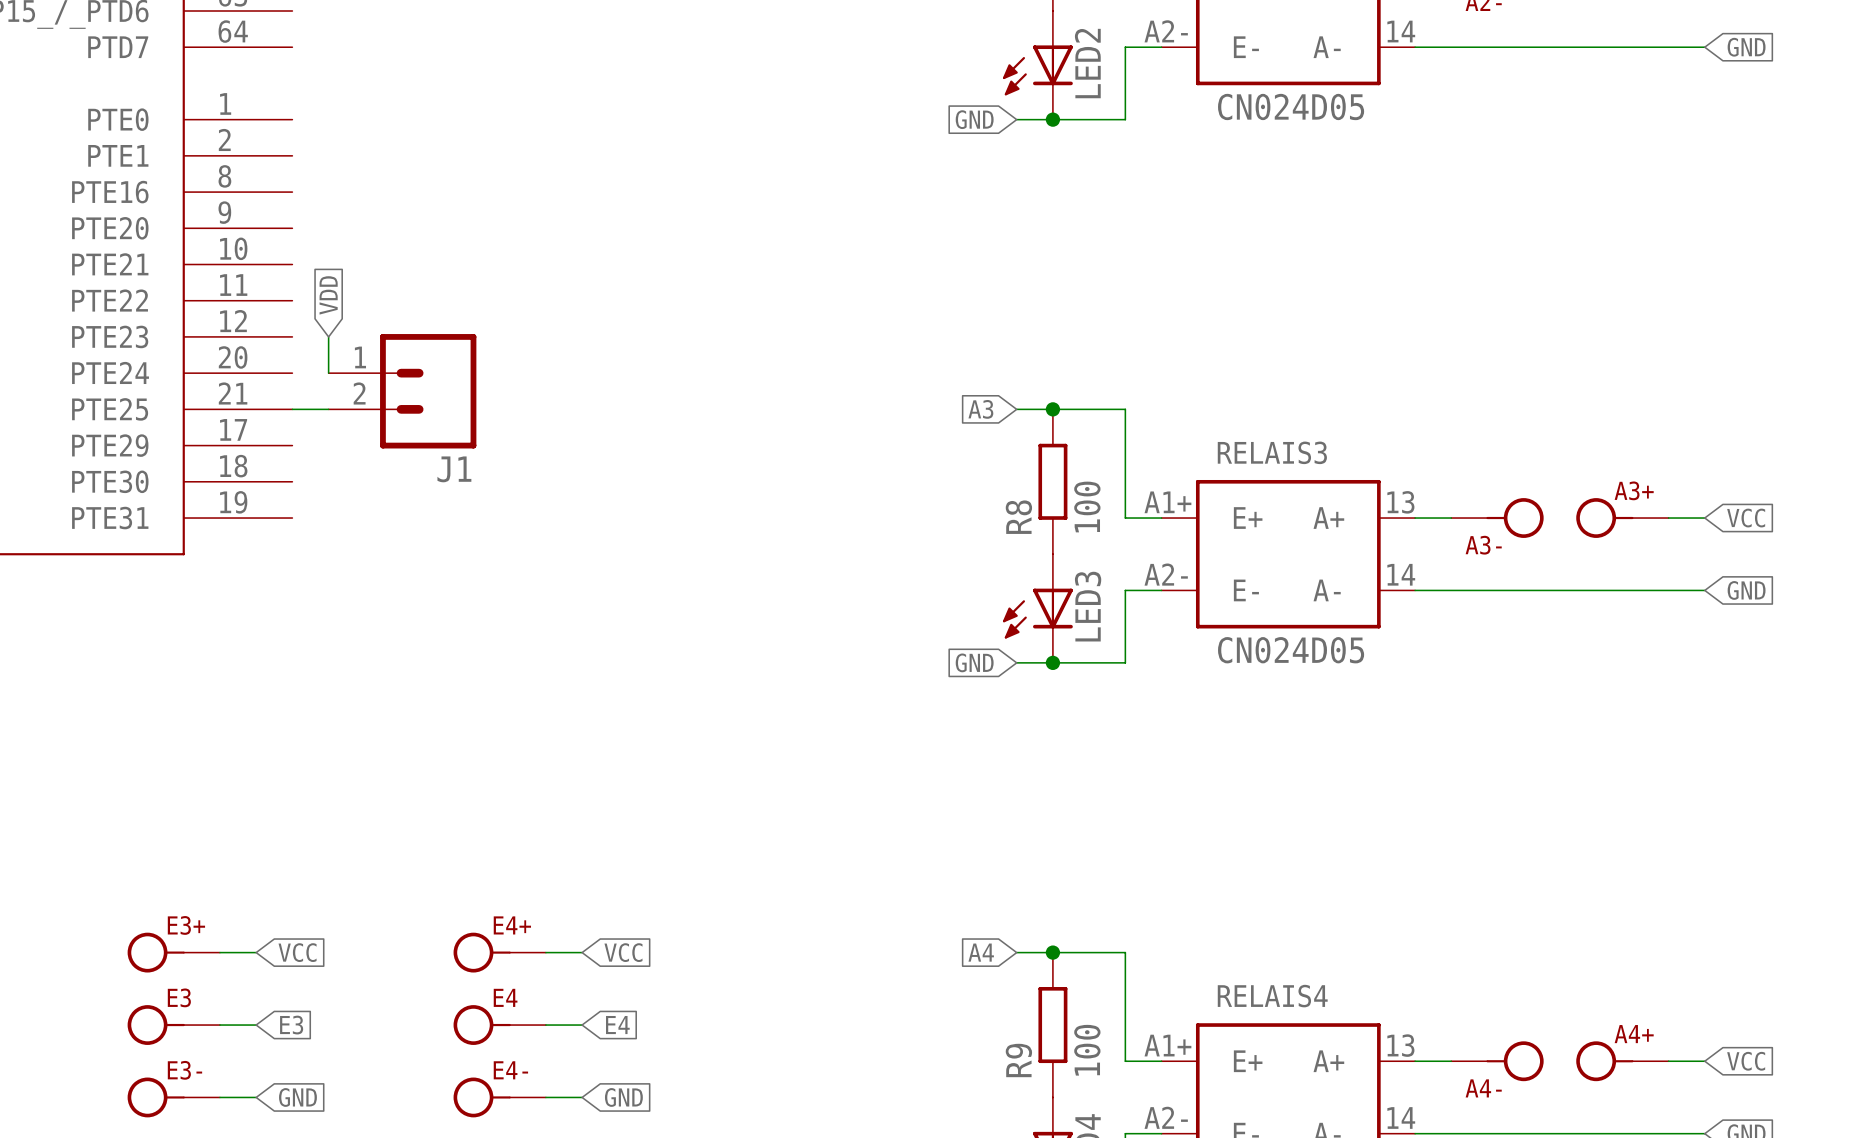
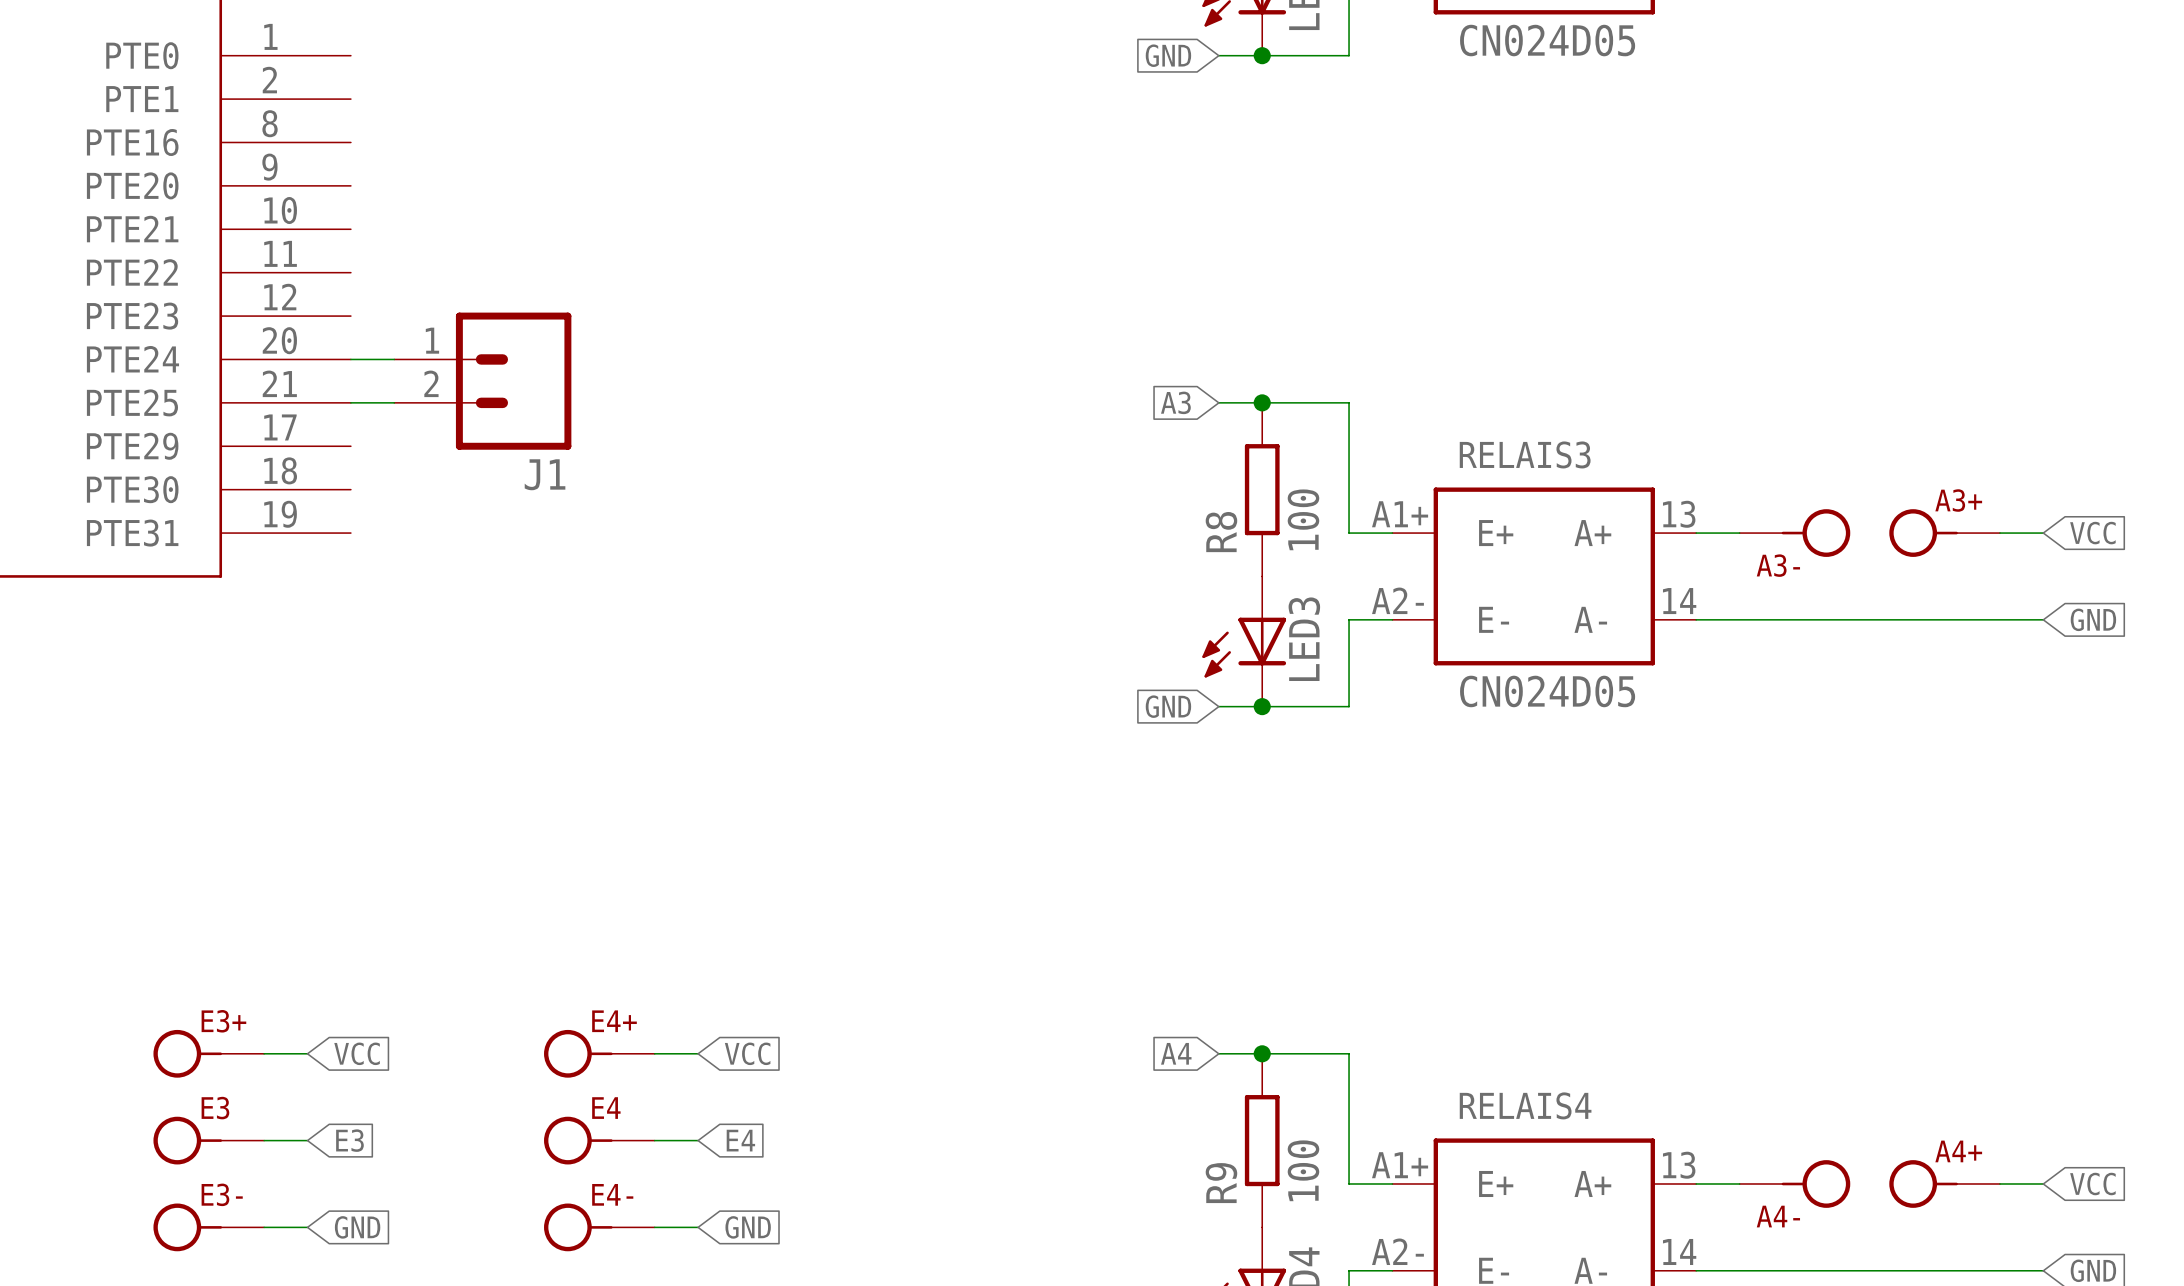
global label: VDD (328, 295) -> none
wire: (328, 336) (328, 373) -> (350, 359) (394, 359)

